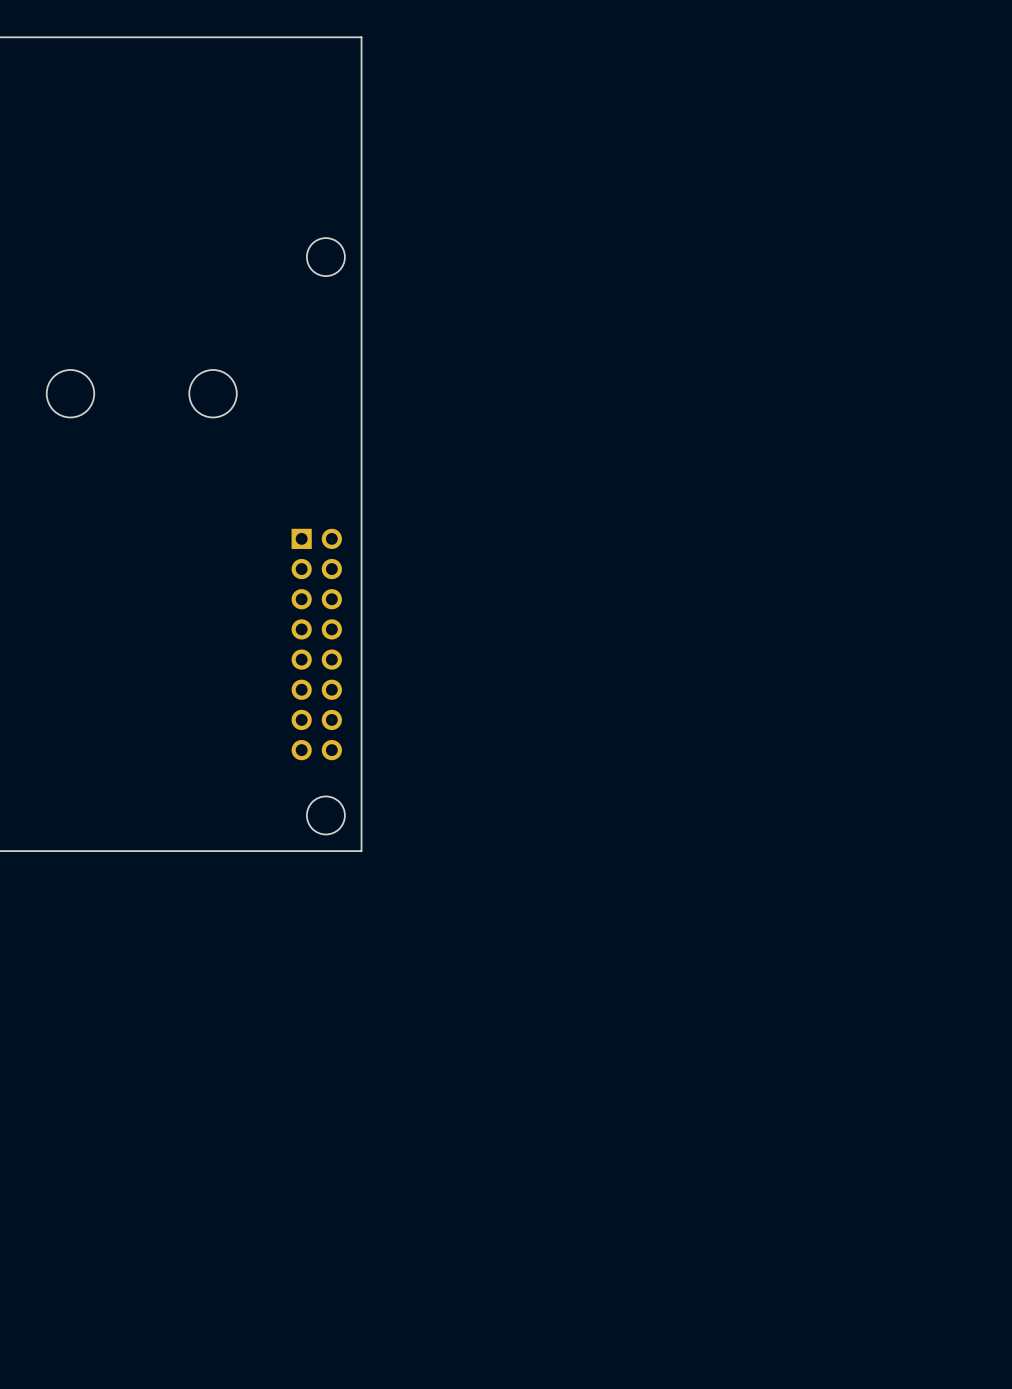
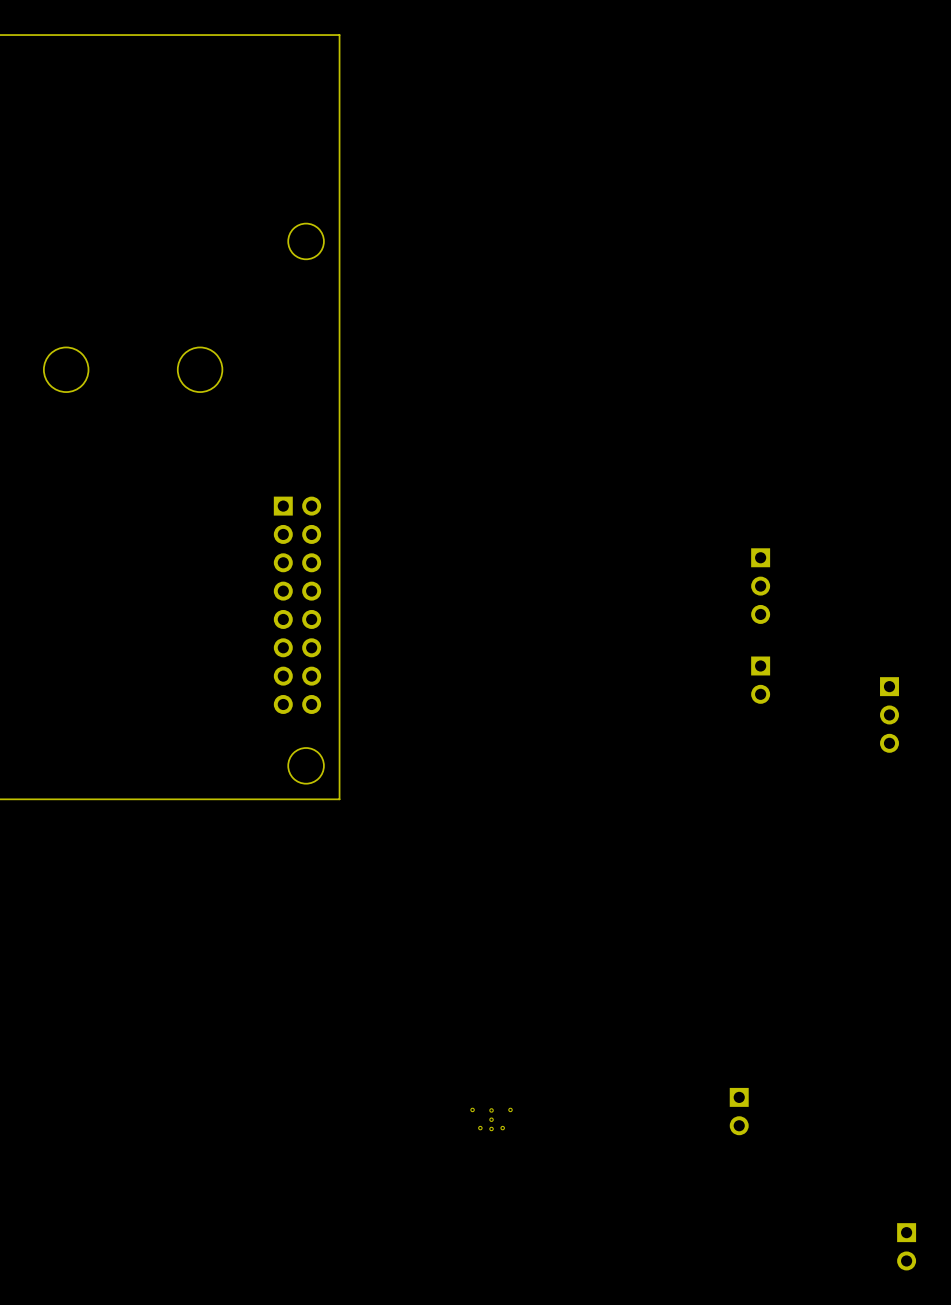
part: none -> (760, 586)
part: none -> (760, 680)
part: none -> (889, 714)
part: none -> (739, 1111)
part: none -> (491, 1119)
part: none -> (906, 1246)

